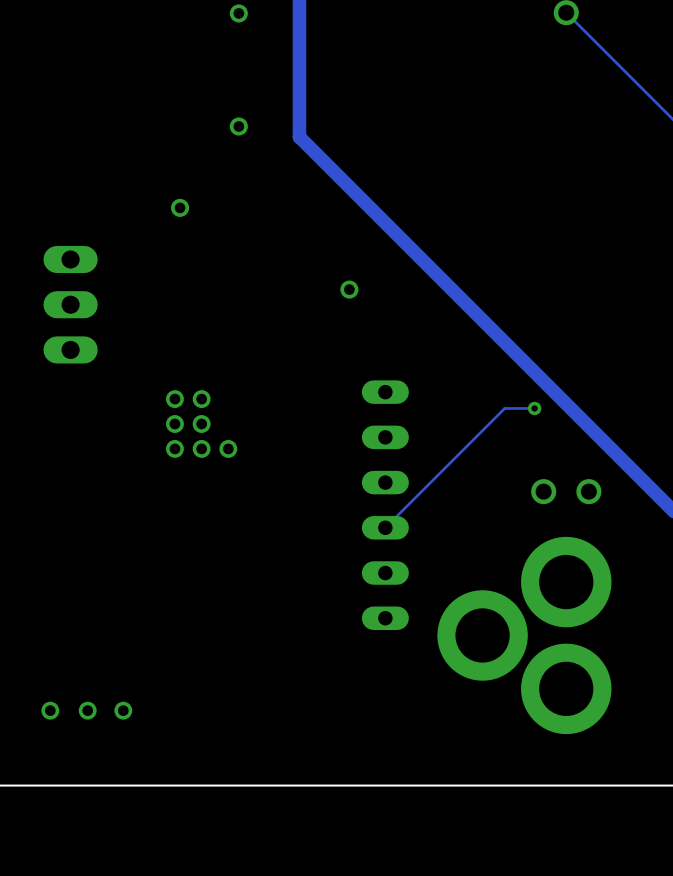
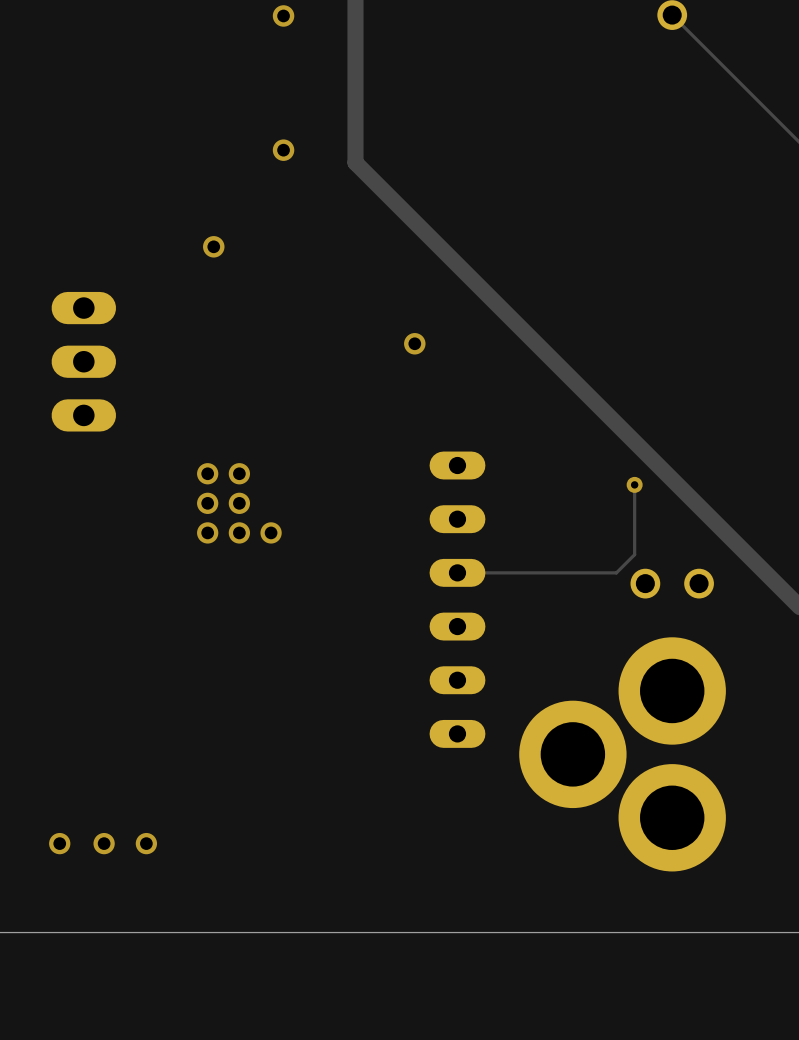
track: (534, 408) (504, 408) (385, 527) -> (634, 484) (634, 554) (616, 572) (457, 572)

